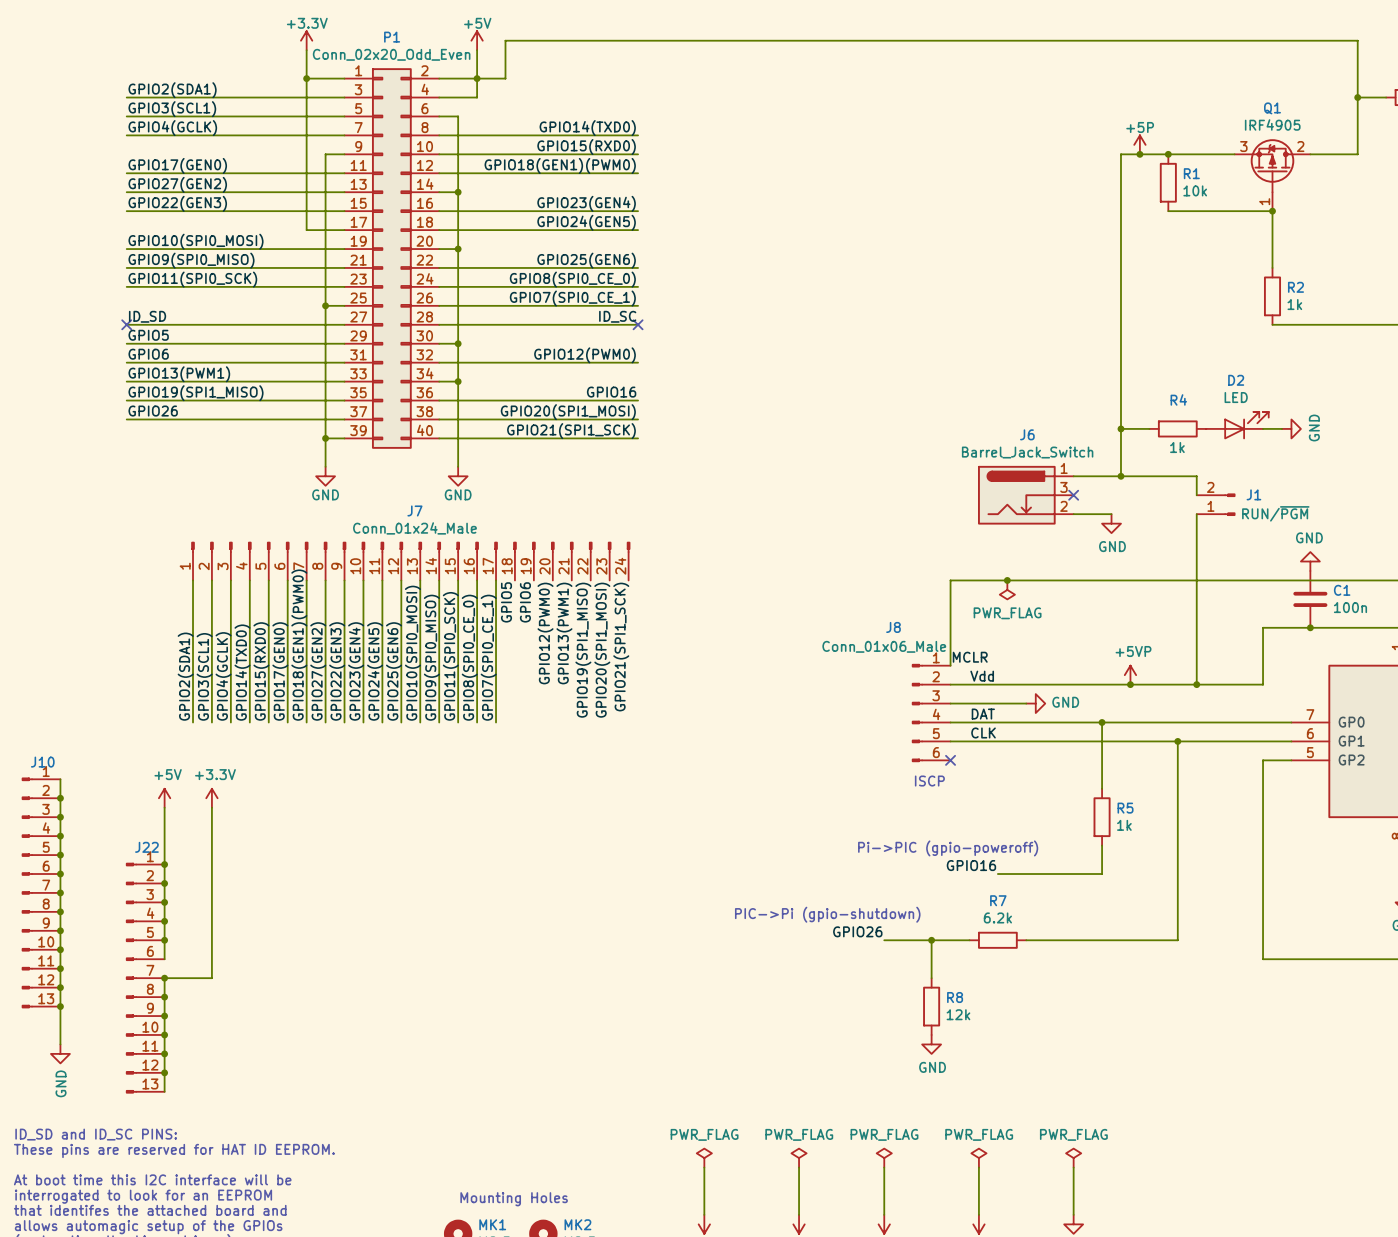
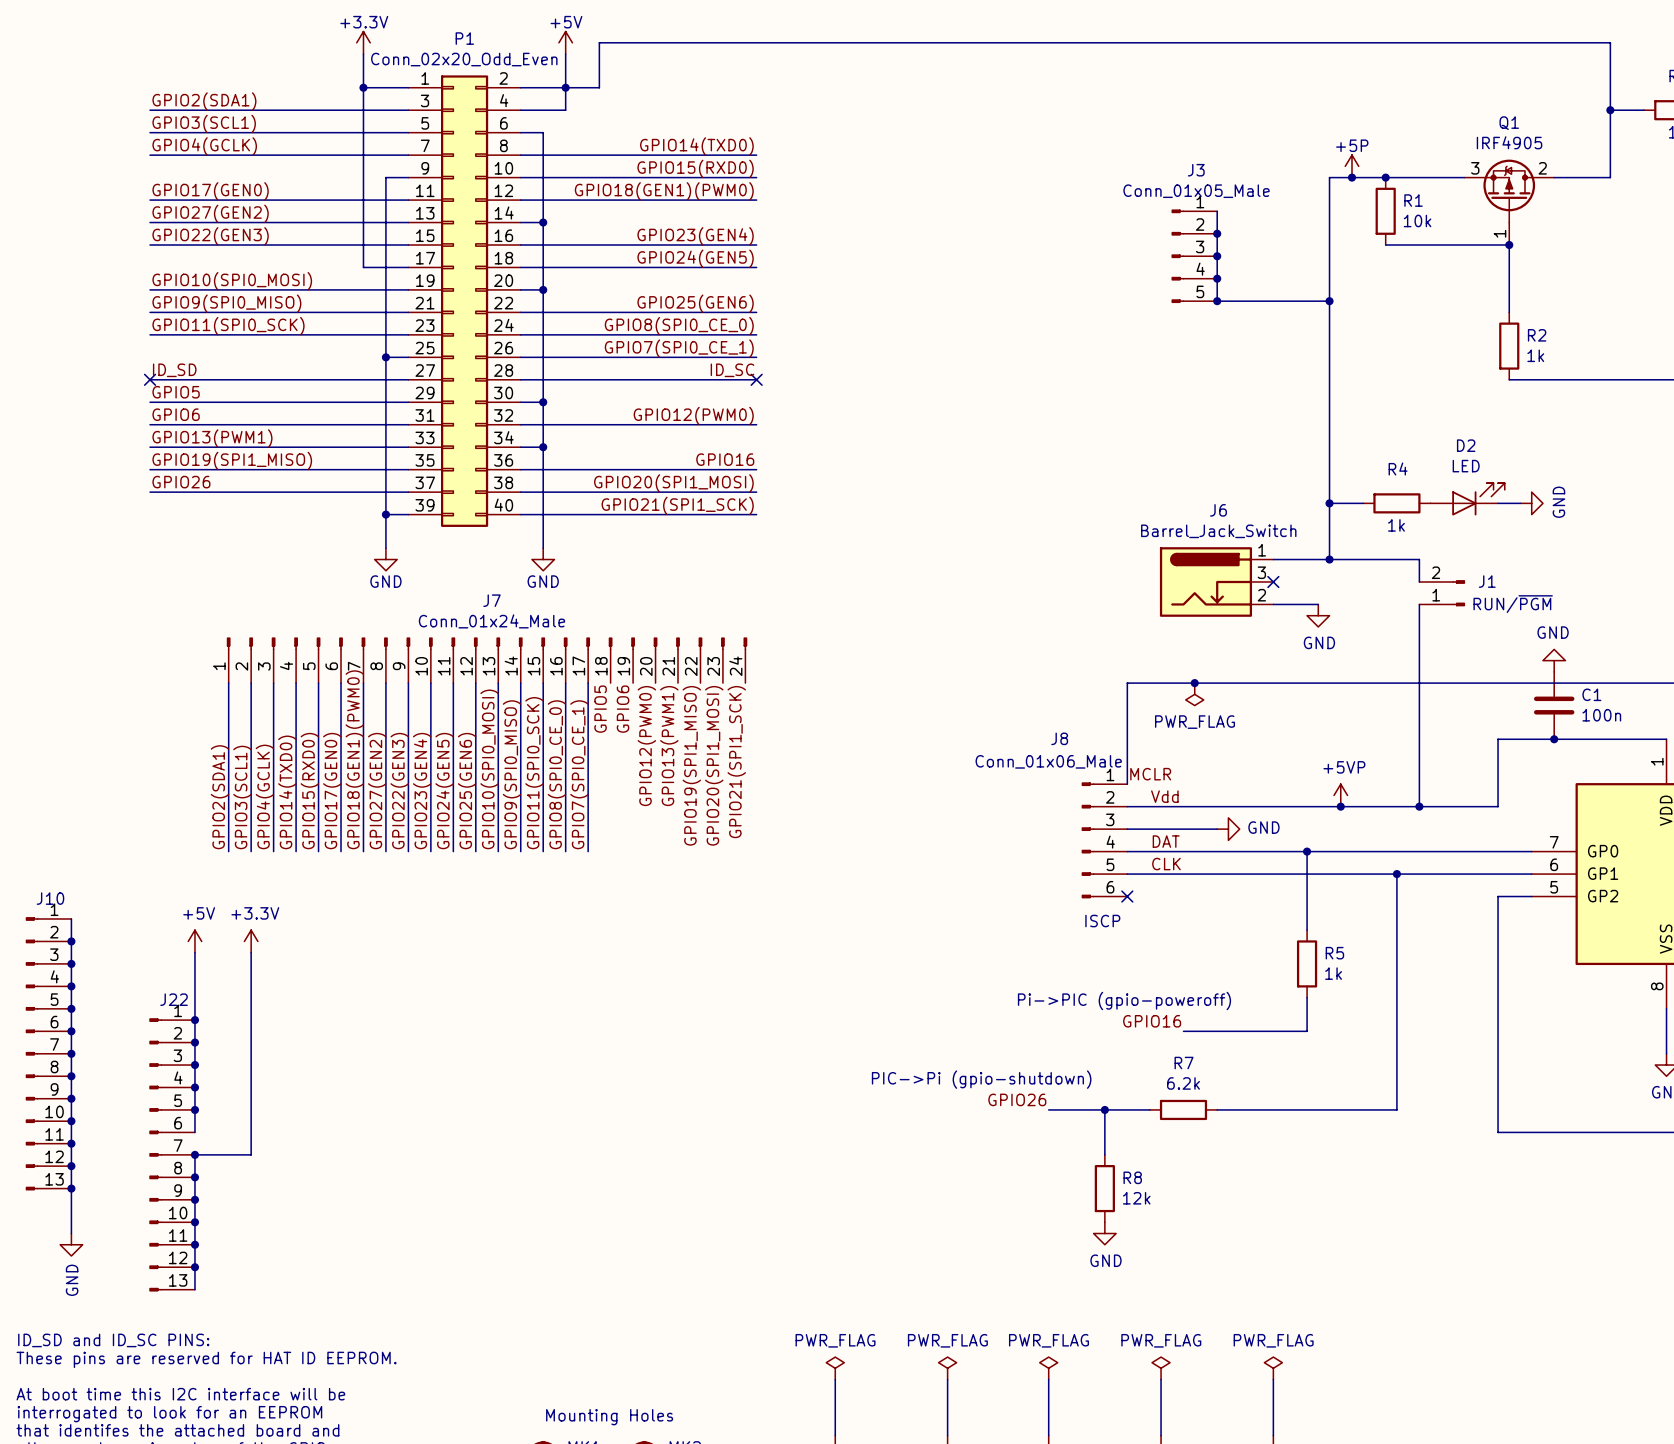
wire: none -> (1217, 211) (1217, 301) (1329, 301)
junction: none -> (1217, 233)
J3: none -> Conn_01x05_Male (1194, 256)
junction: none -> (1217, 256)
junction: none -> (1217, 278)
junction: none -> (1217, 301)
junction: none -> (1329, 301)

